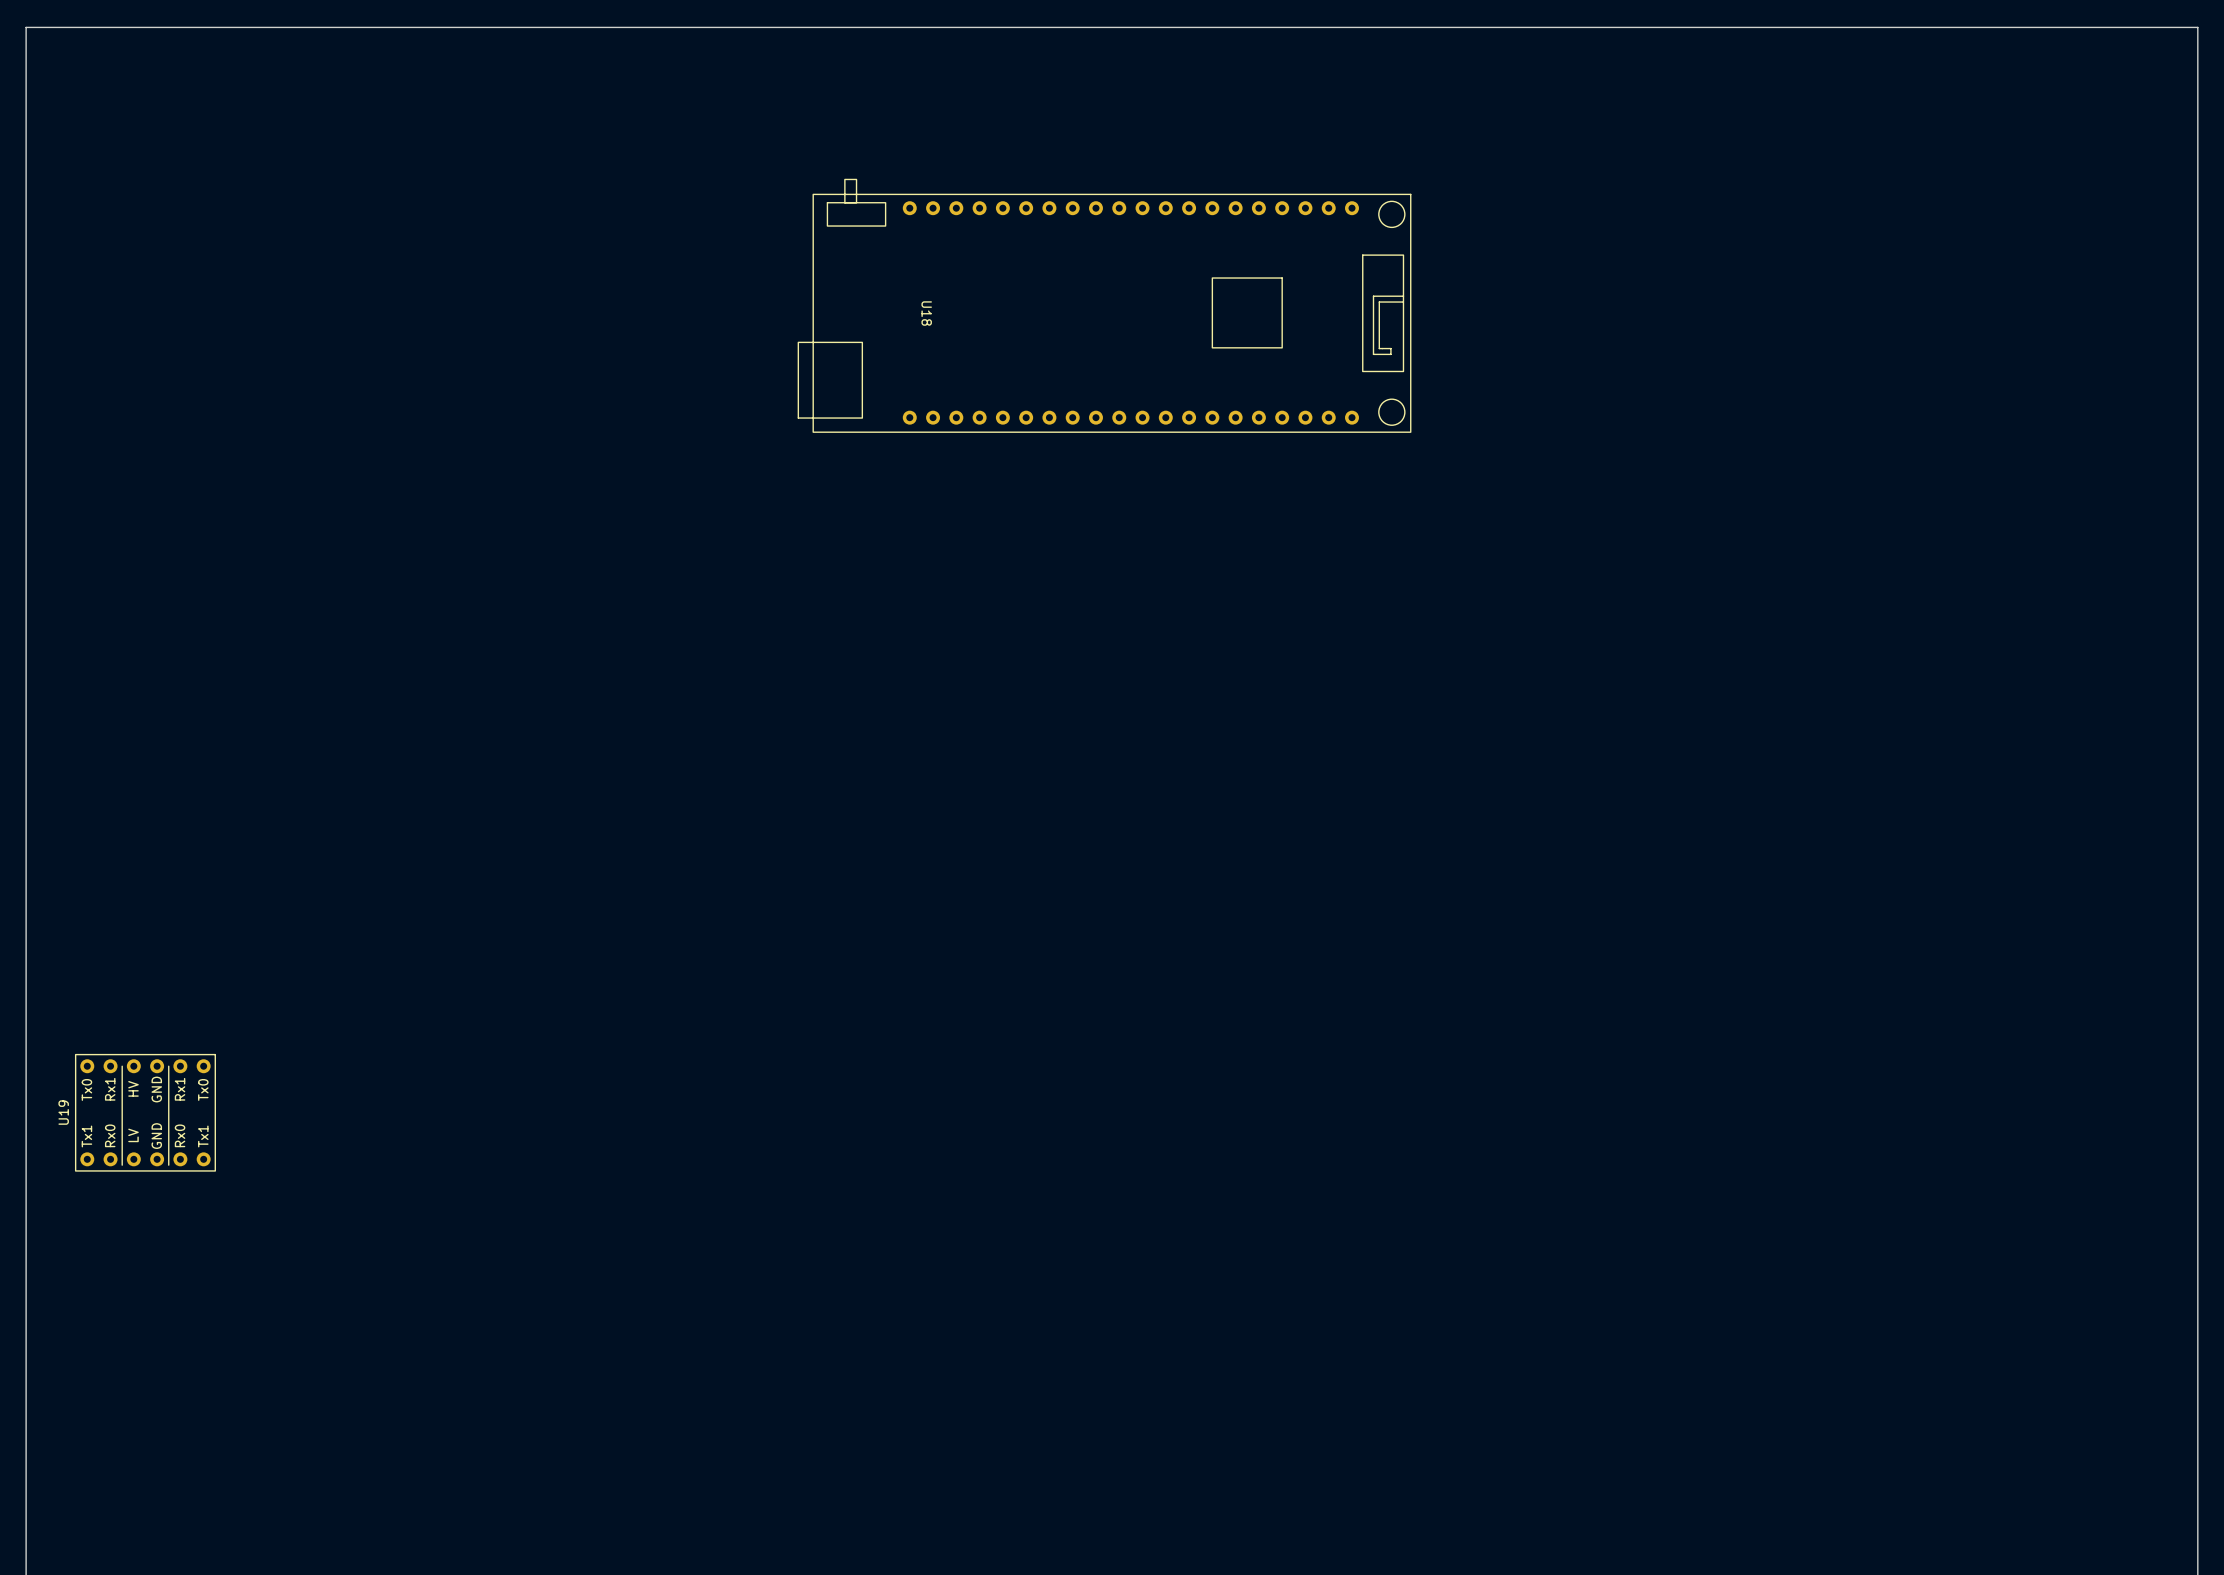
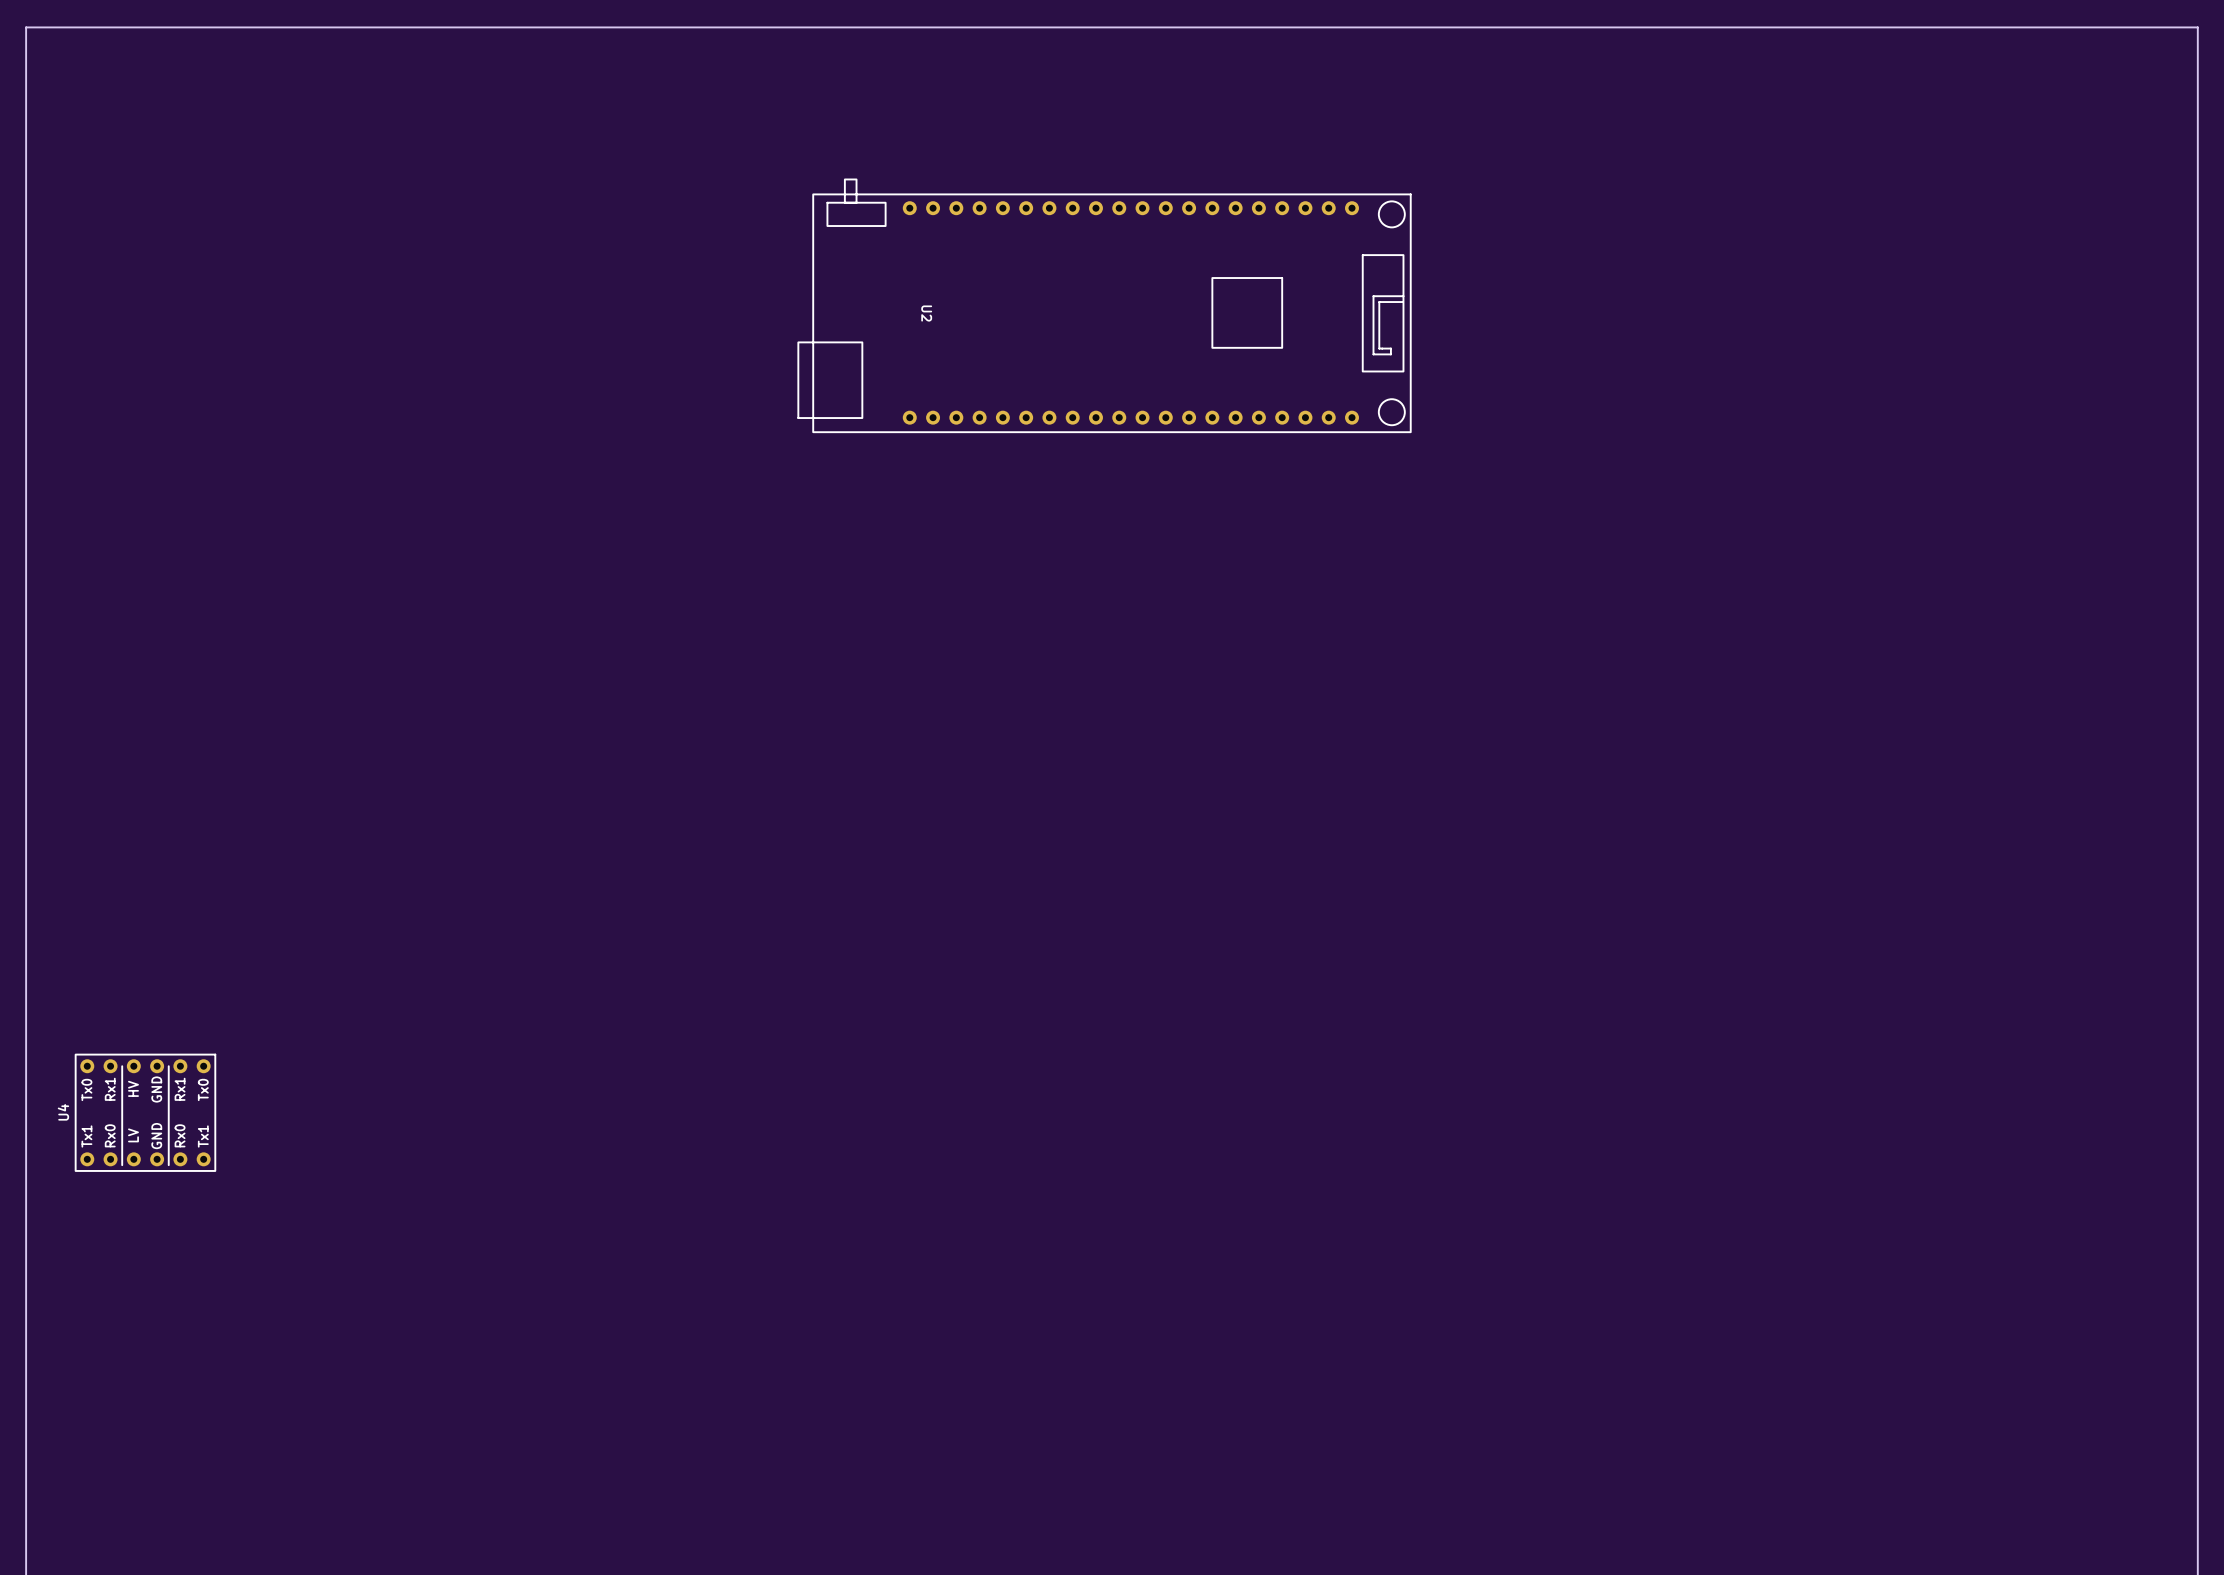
U18 name: U18 (926, 313) -> U2 (926, 313)
U19 name: U19 (63, 1112) -> U4 (63, 1112)

